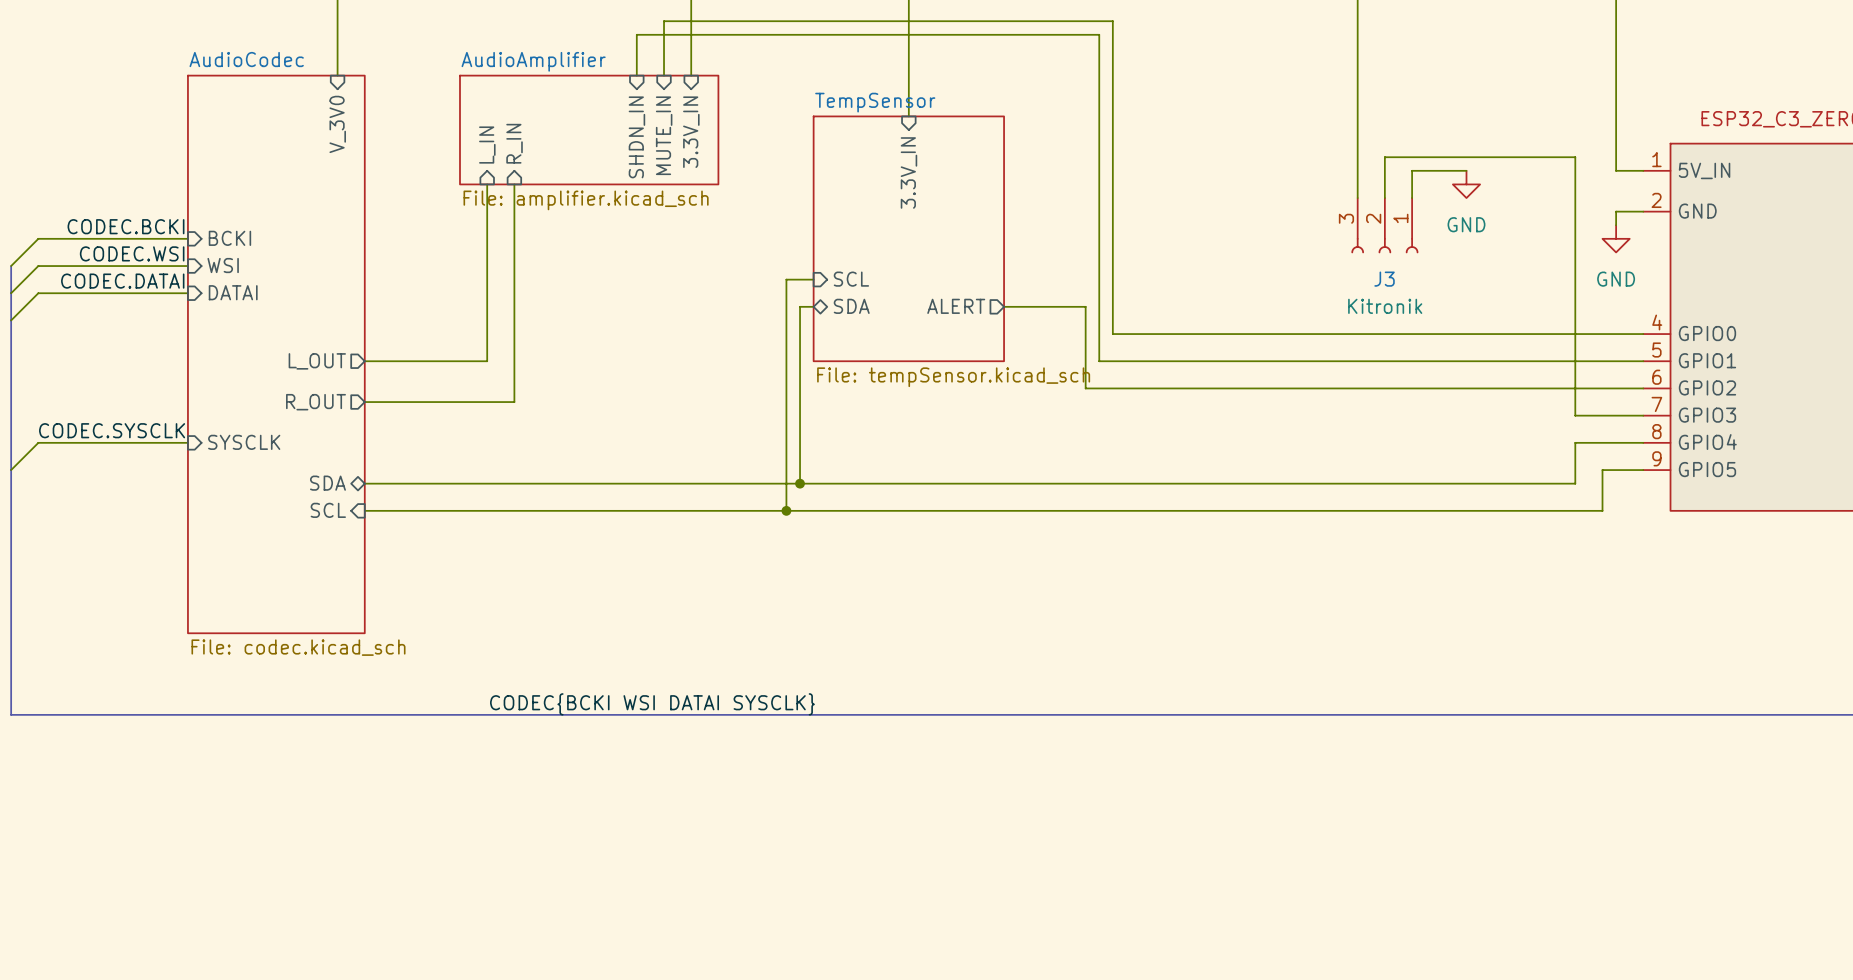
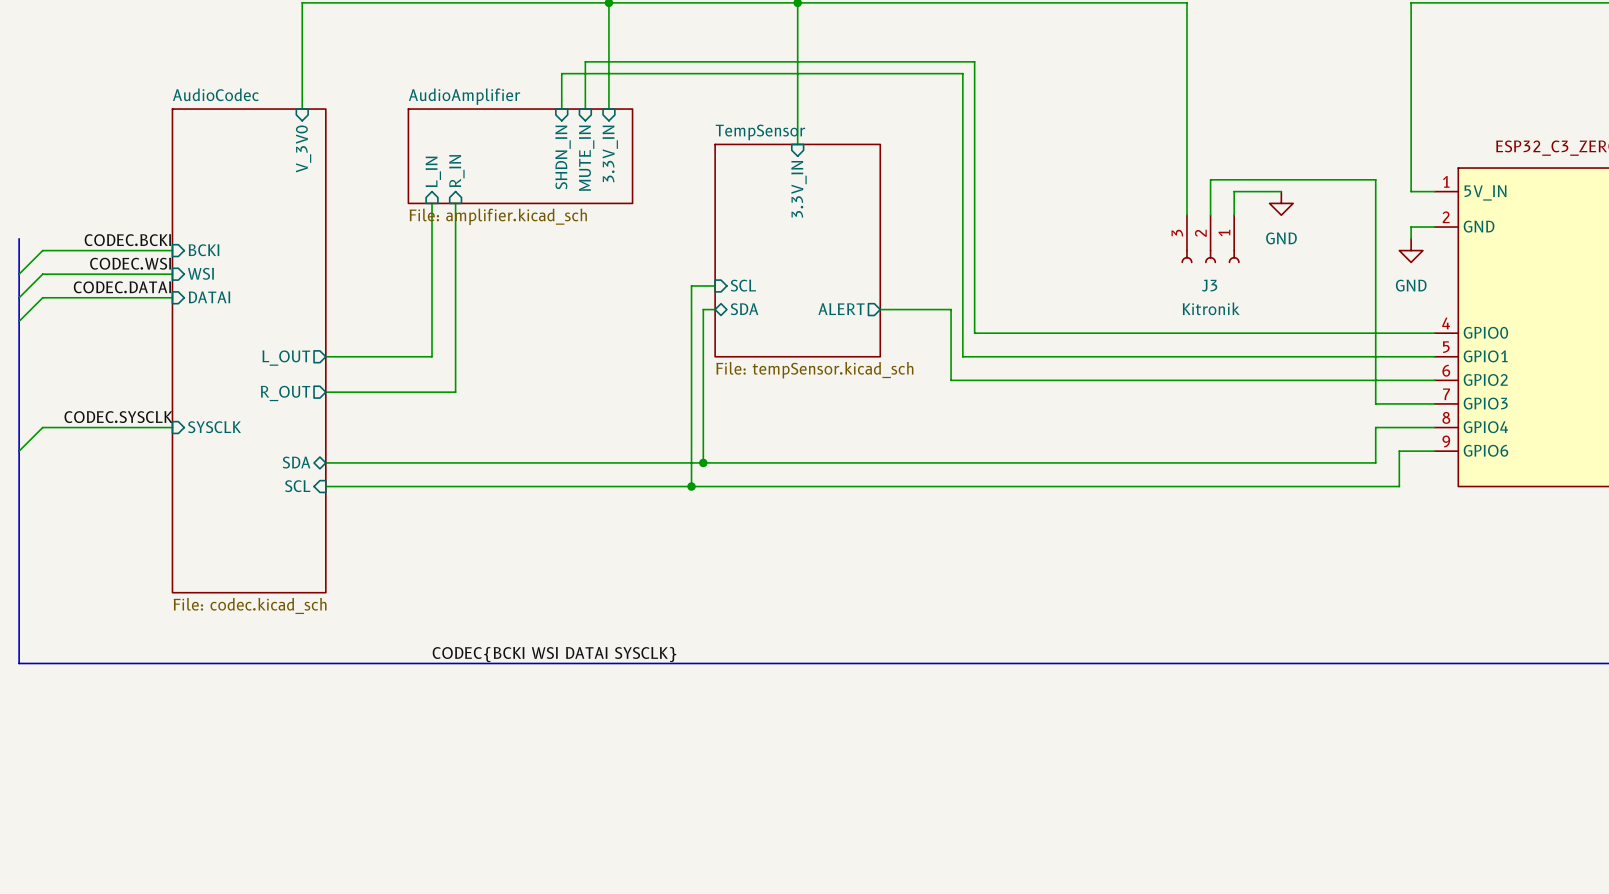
bus: none -> (19, 238) (19, 274)
part pin name: GPIO5 (1707, 469) -> GPIO6 (1485, 450)

